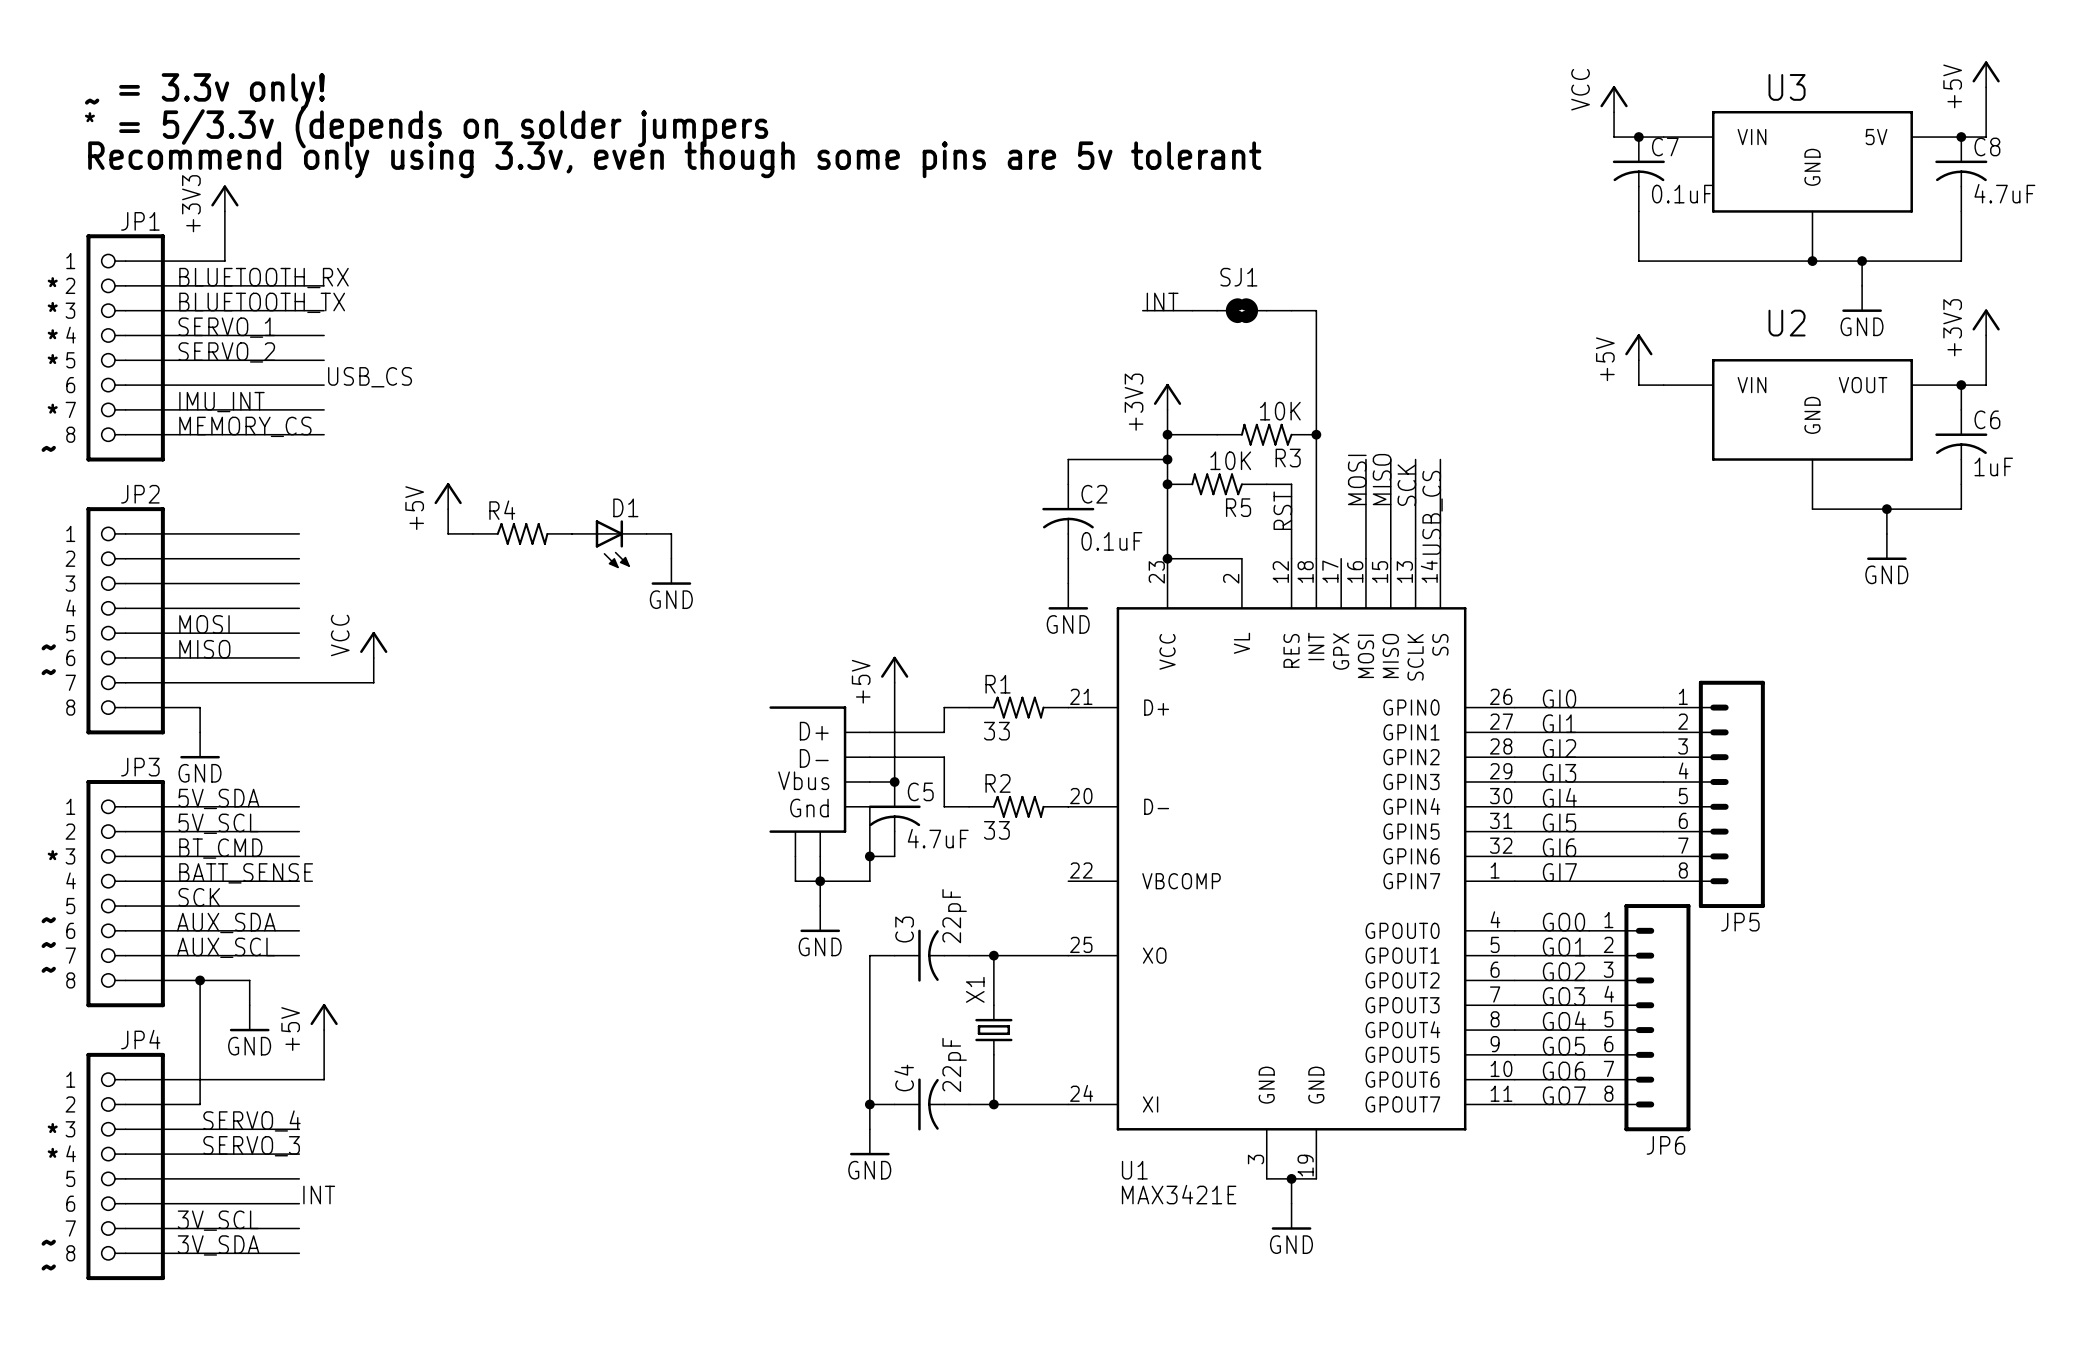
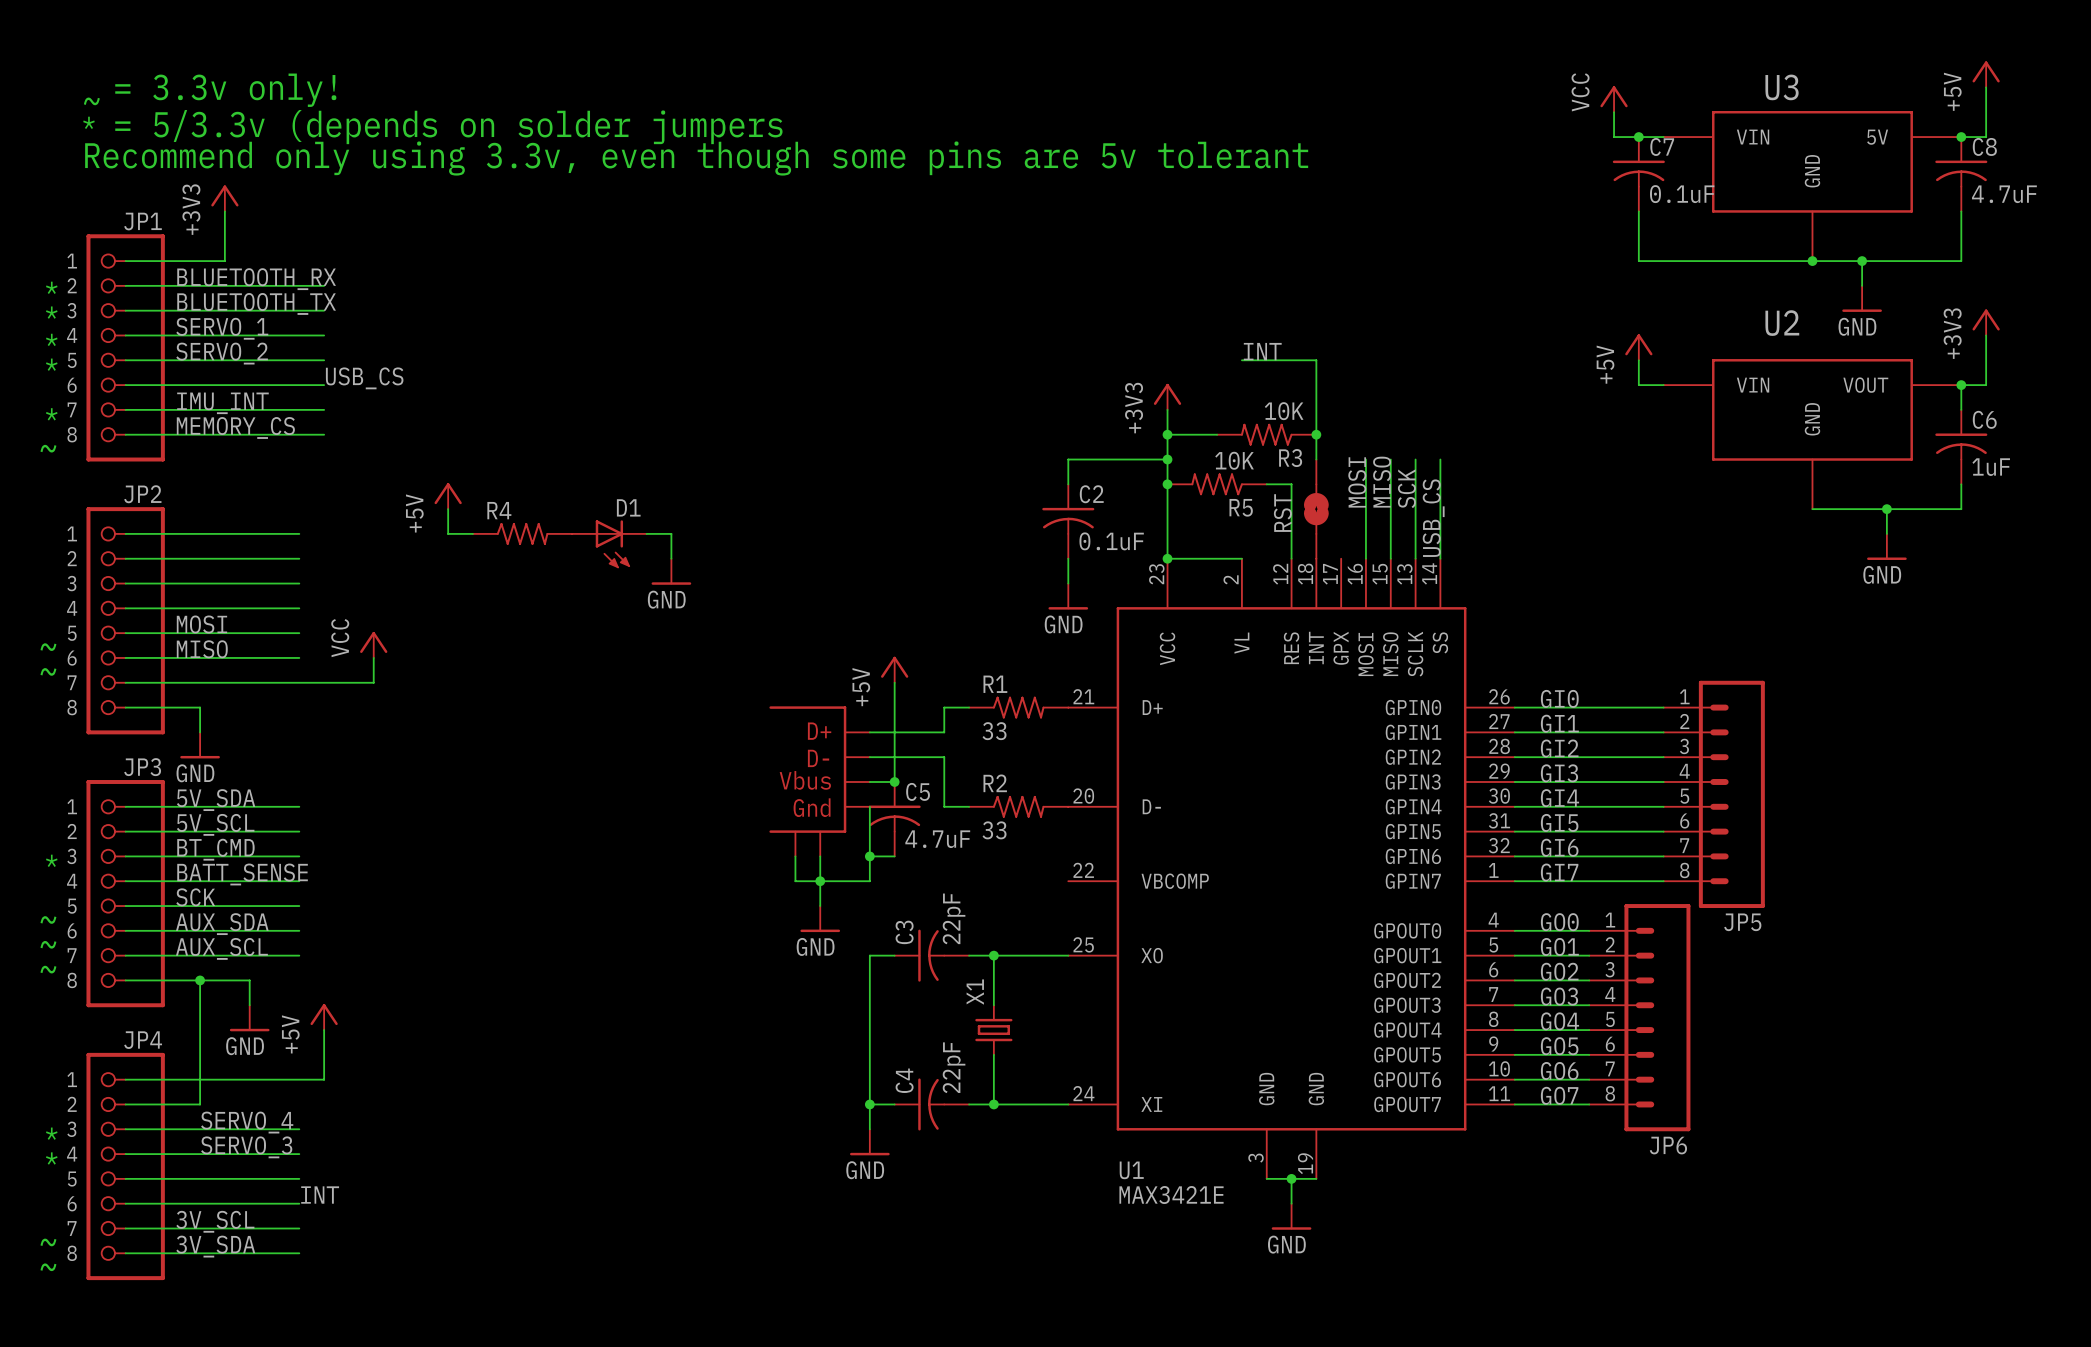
label position: INT (1162, 302) -> INT (1262, 351)
wire: (1142, 310) (1192, 310) -> none
SJ1: (1241, 310) -> none
wire: (1291, 310) (1316, 310) (1316, 360) -> (1241, 360) (1316, 360)
part: none -> (1316, 509)

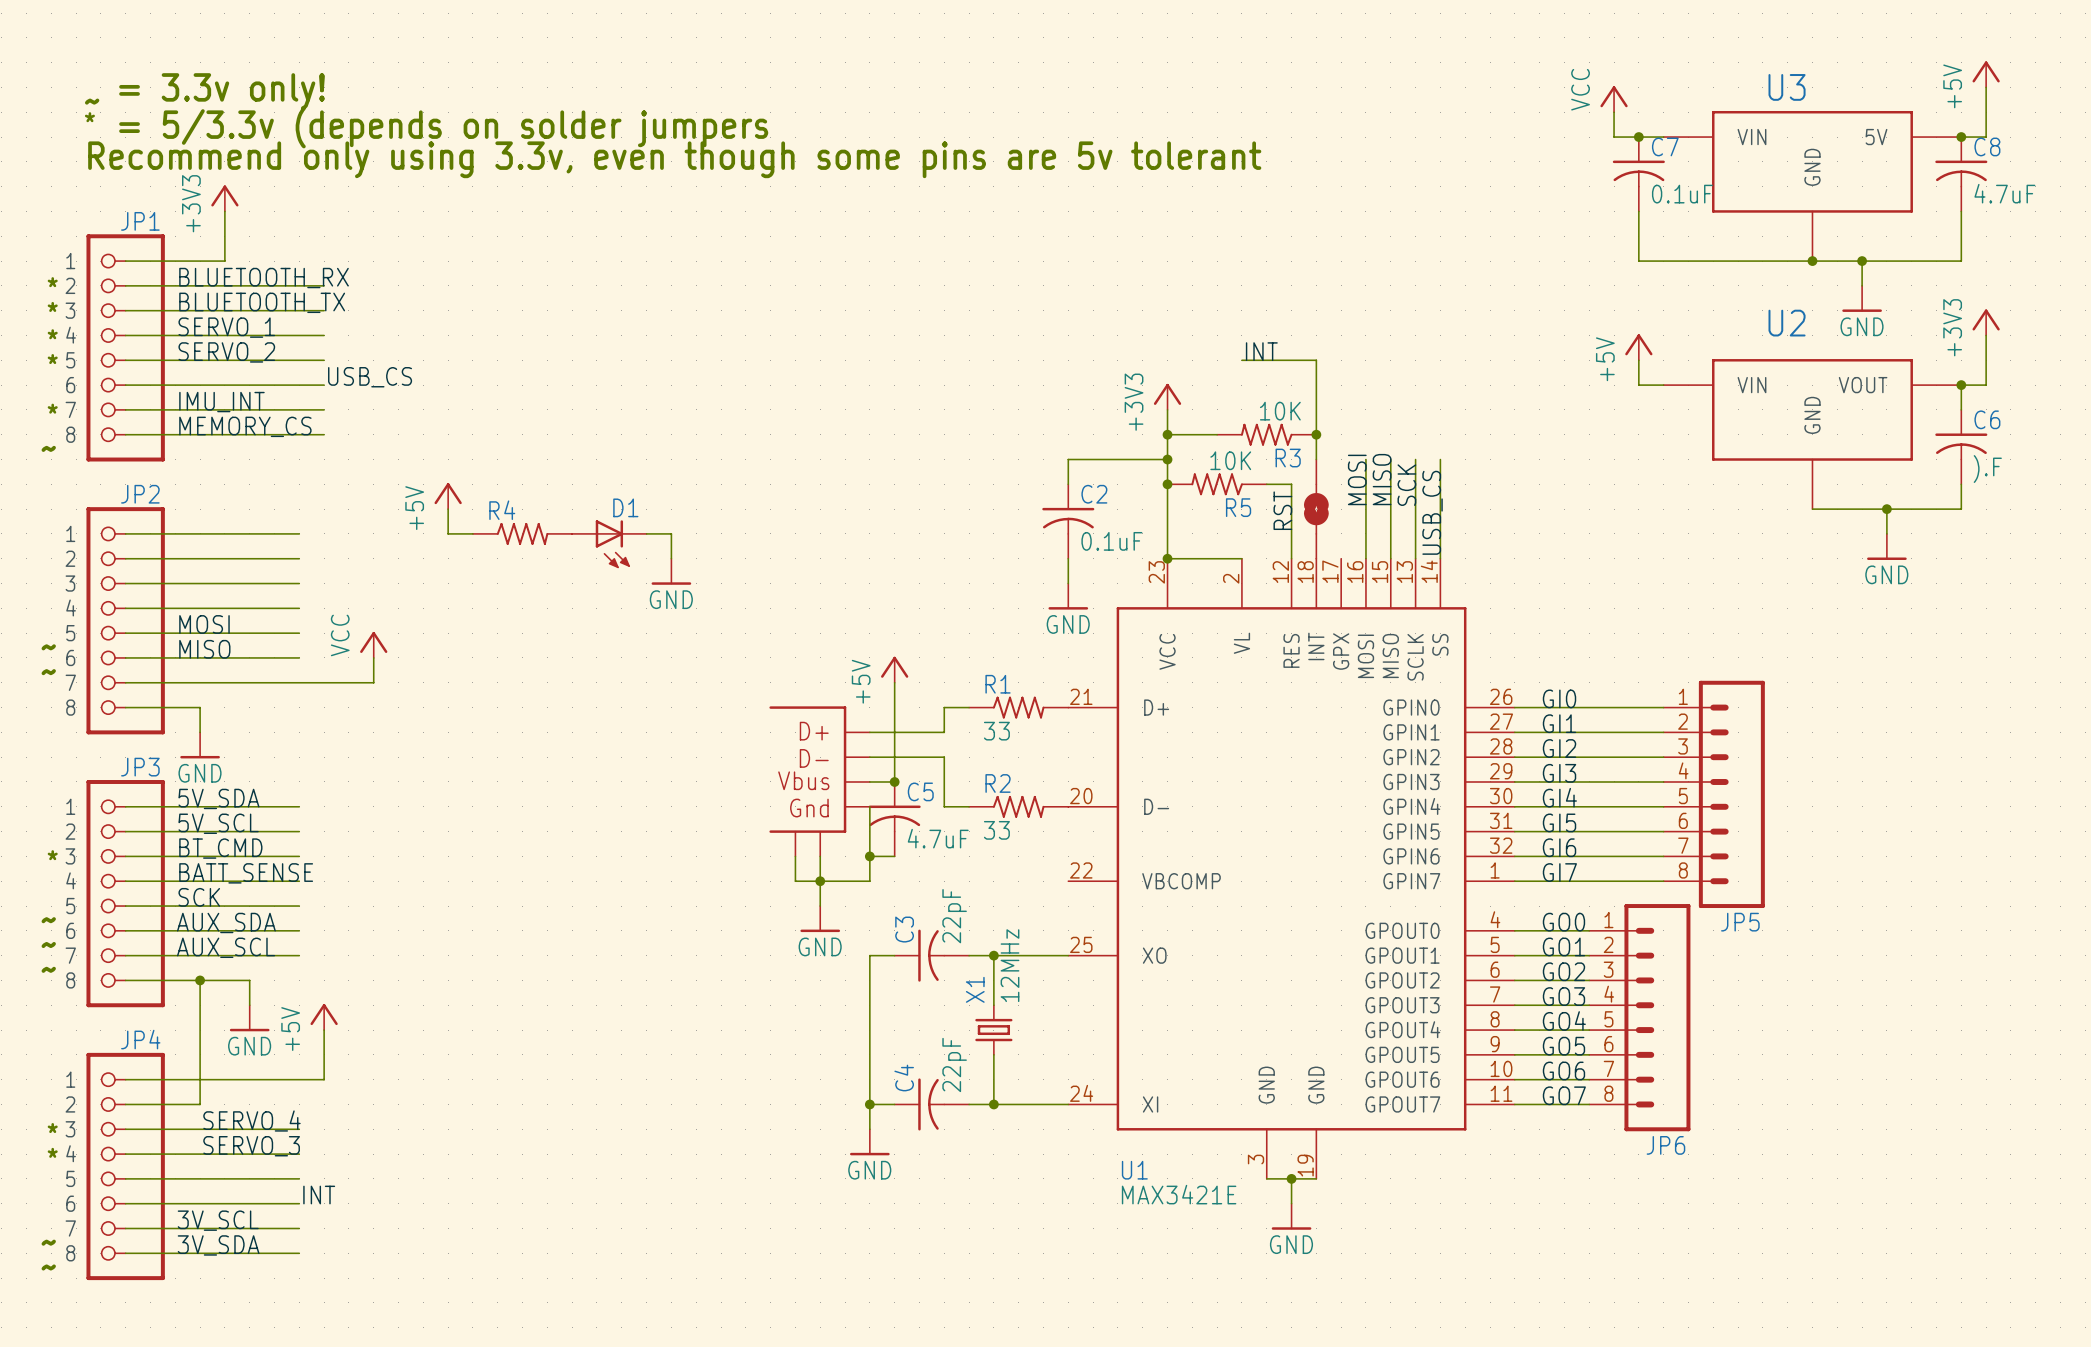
C6 value: 1uF (1991, 467) -> ).F (1987, 469)
X1 value: none -> 12MHz (1010, 965)

